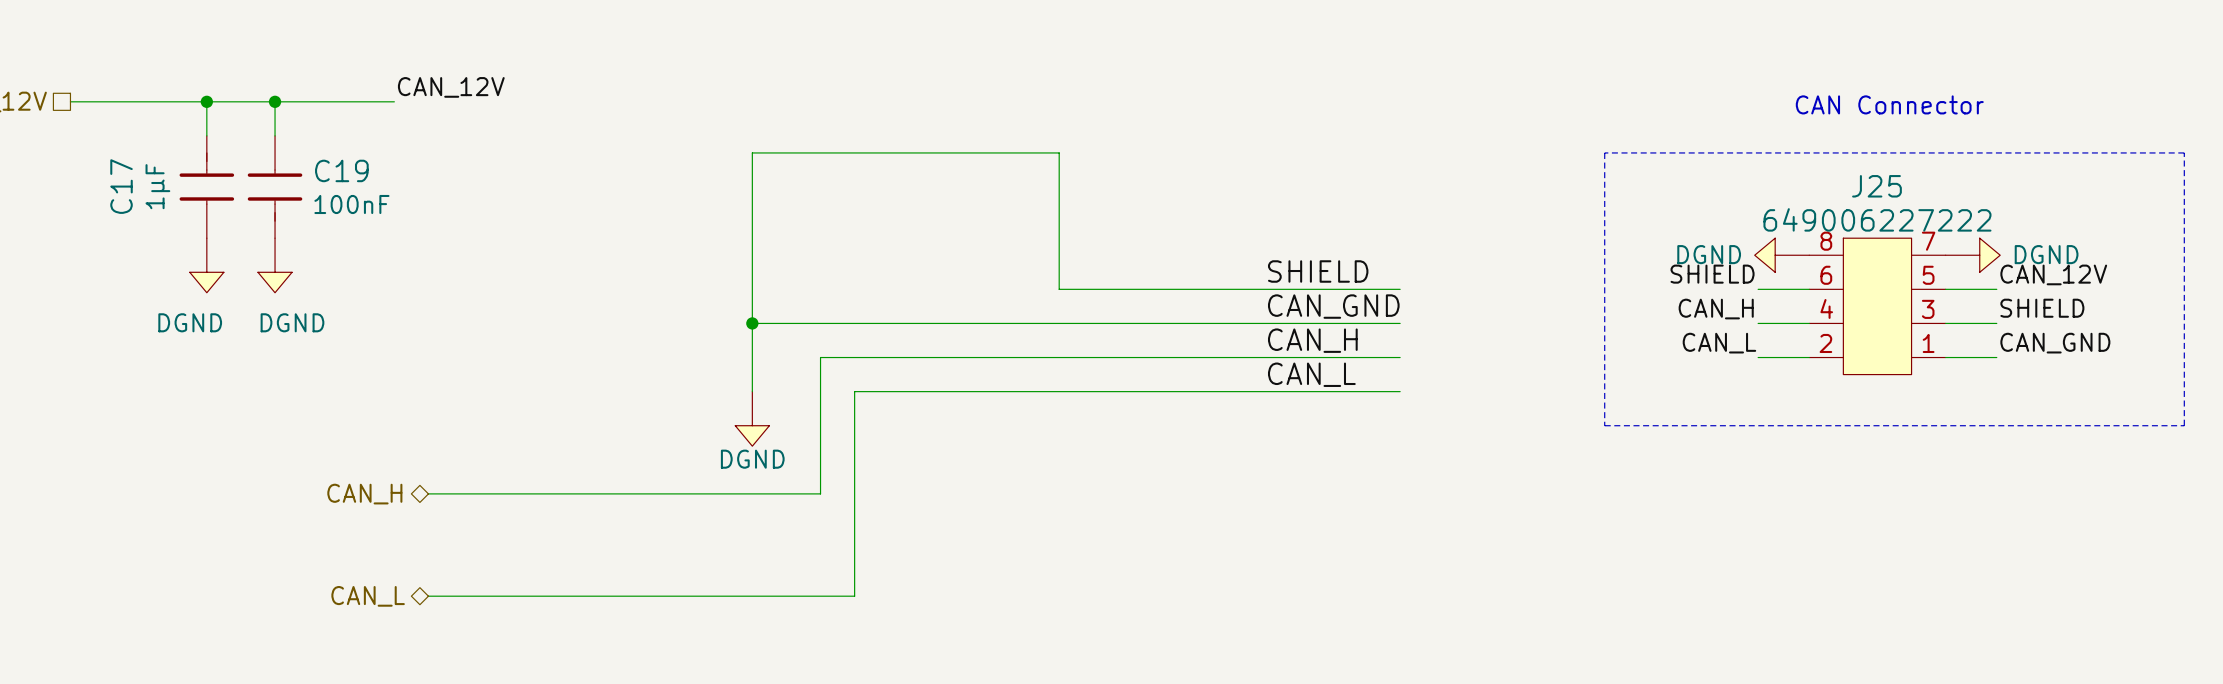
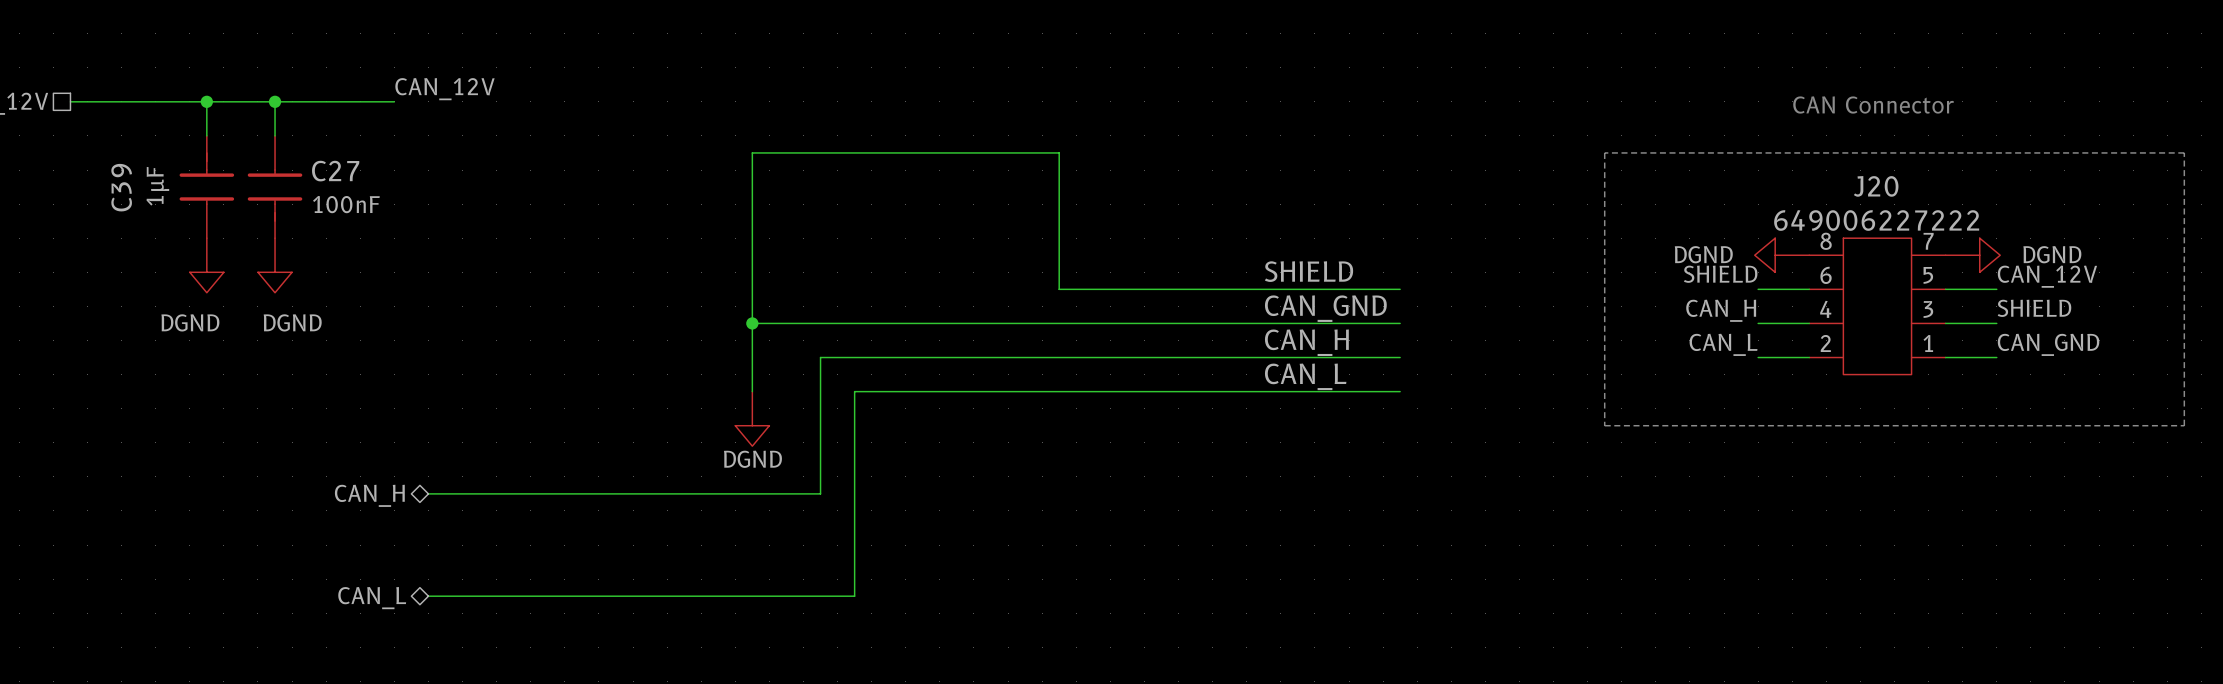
C19 name: C19 (341, 170) -> C27 (335, 171)
C17 name: C17 (121, 186) -> C39 (121, 187)
J25 name: J25 (1876, 186) -> J20 (1876, 186)

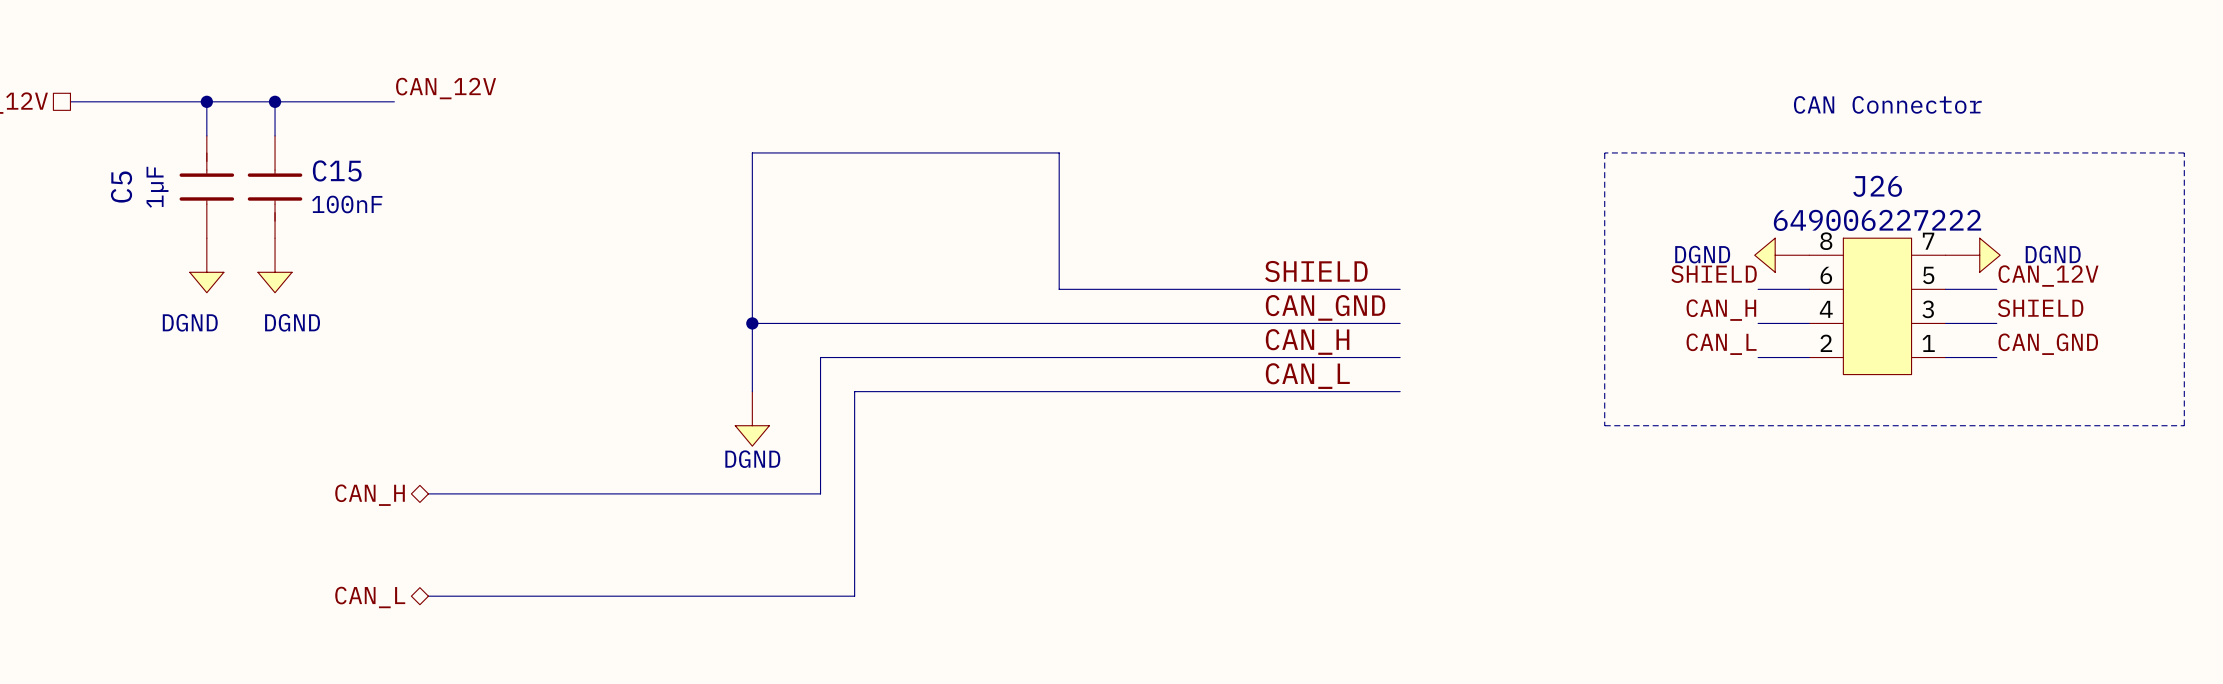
C27 name: C27 (335, 171) -> C15 (337, 170)
J20 name: J20 (1876, 186) -> J26 (1877, 186)
C39 name: C39 (121, 187) -> C5 (121, 187)

